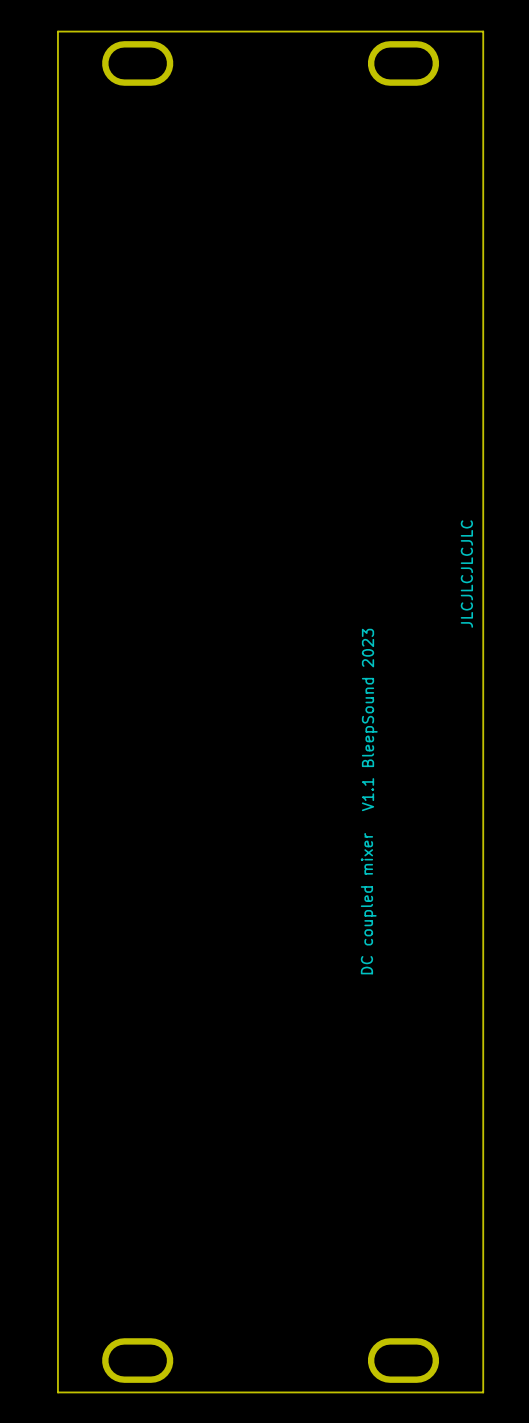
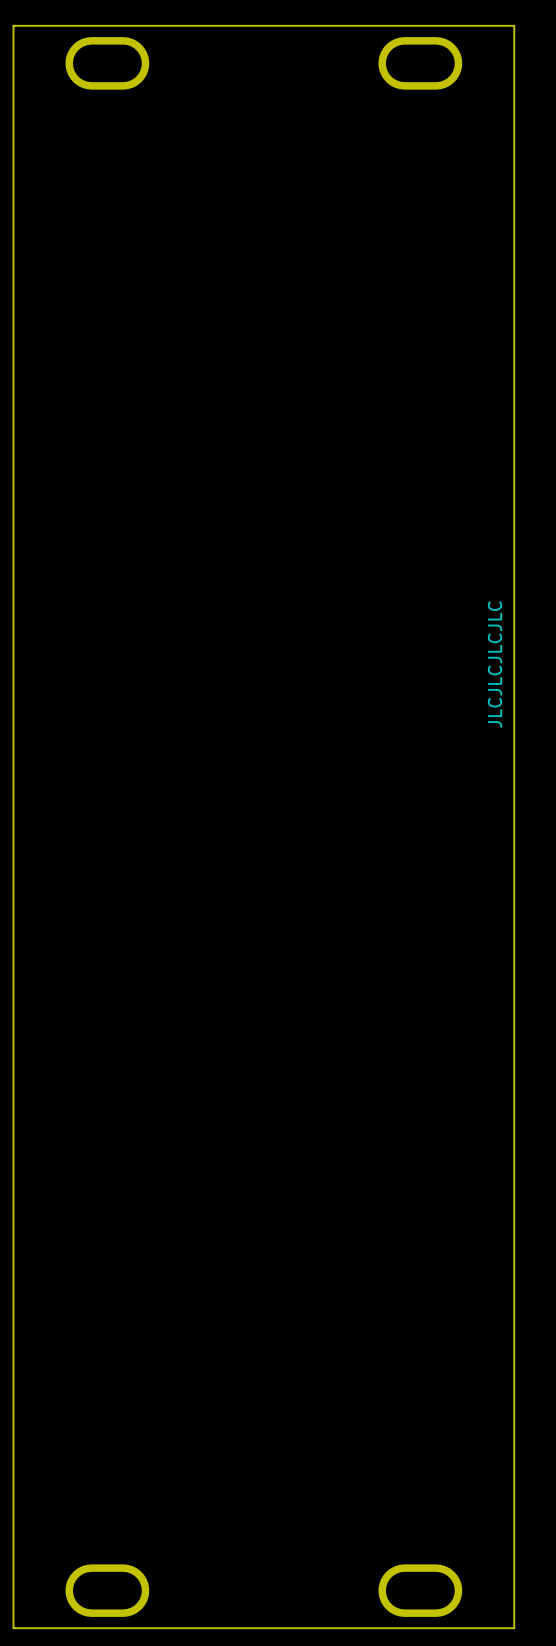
text: V1.1 BleepSound 2023 (369, 719) -> none
text: DC coupled mixer (368, 903) -> none

